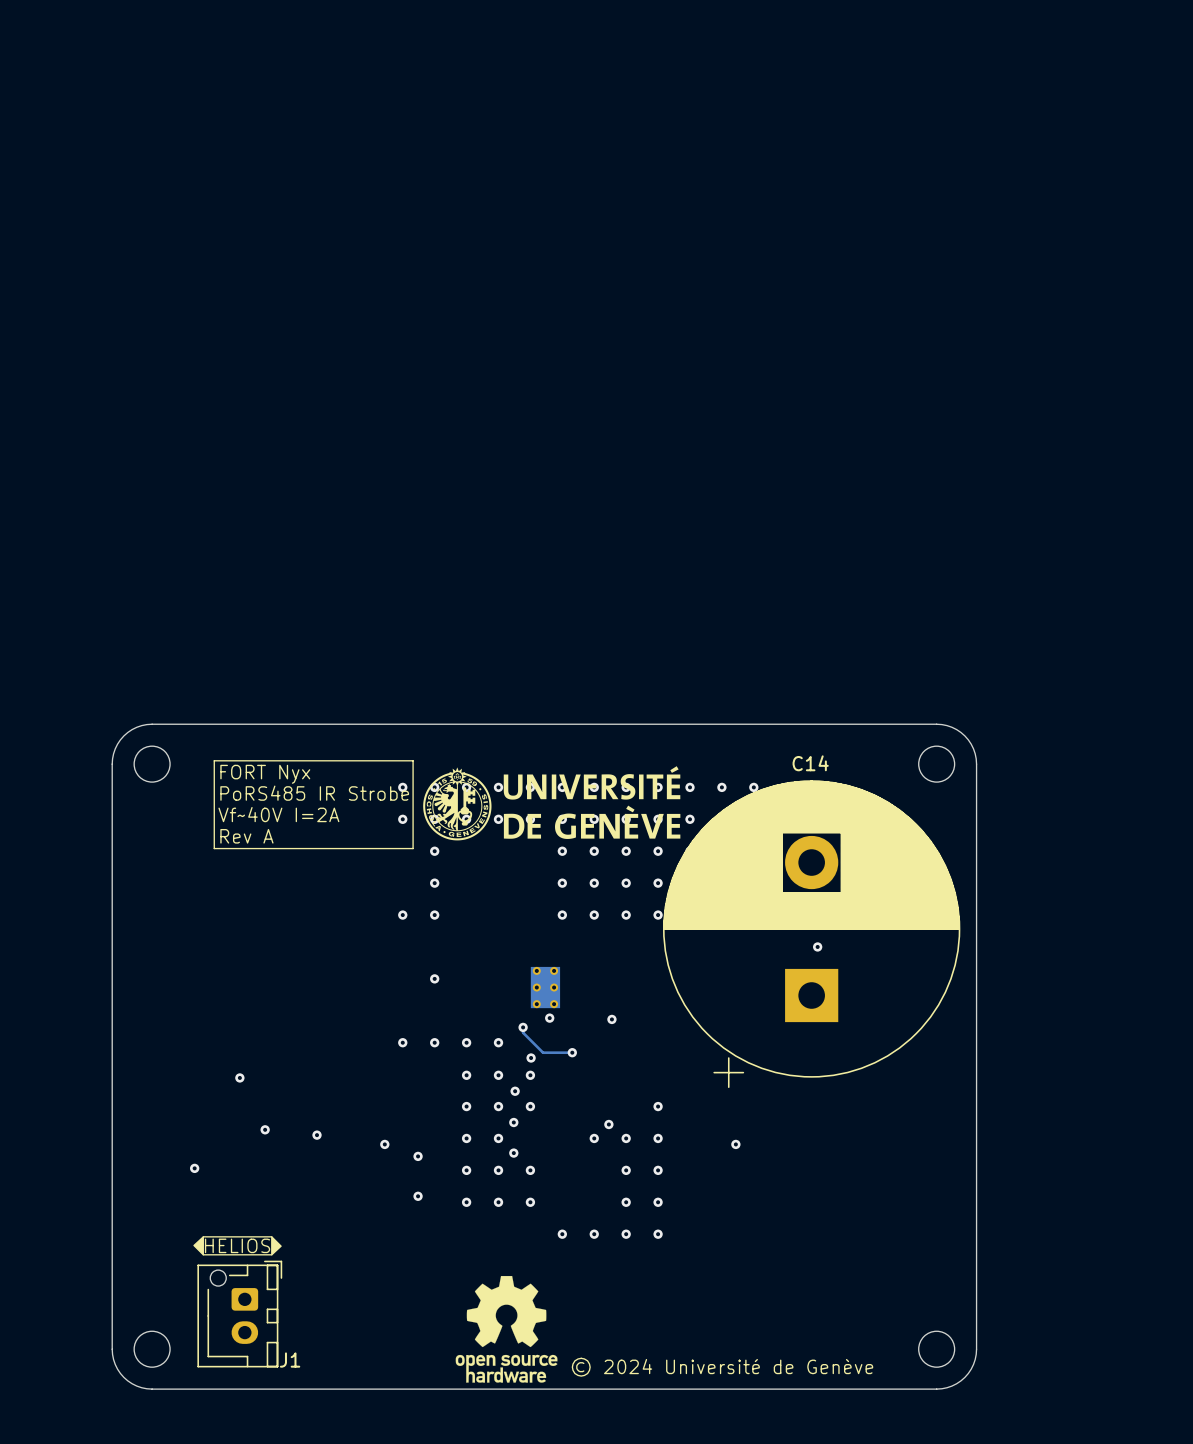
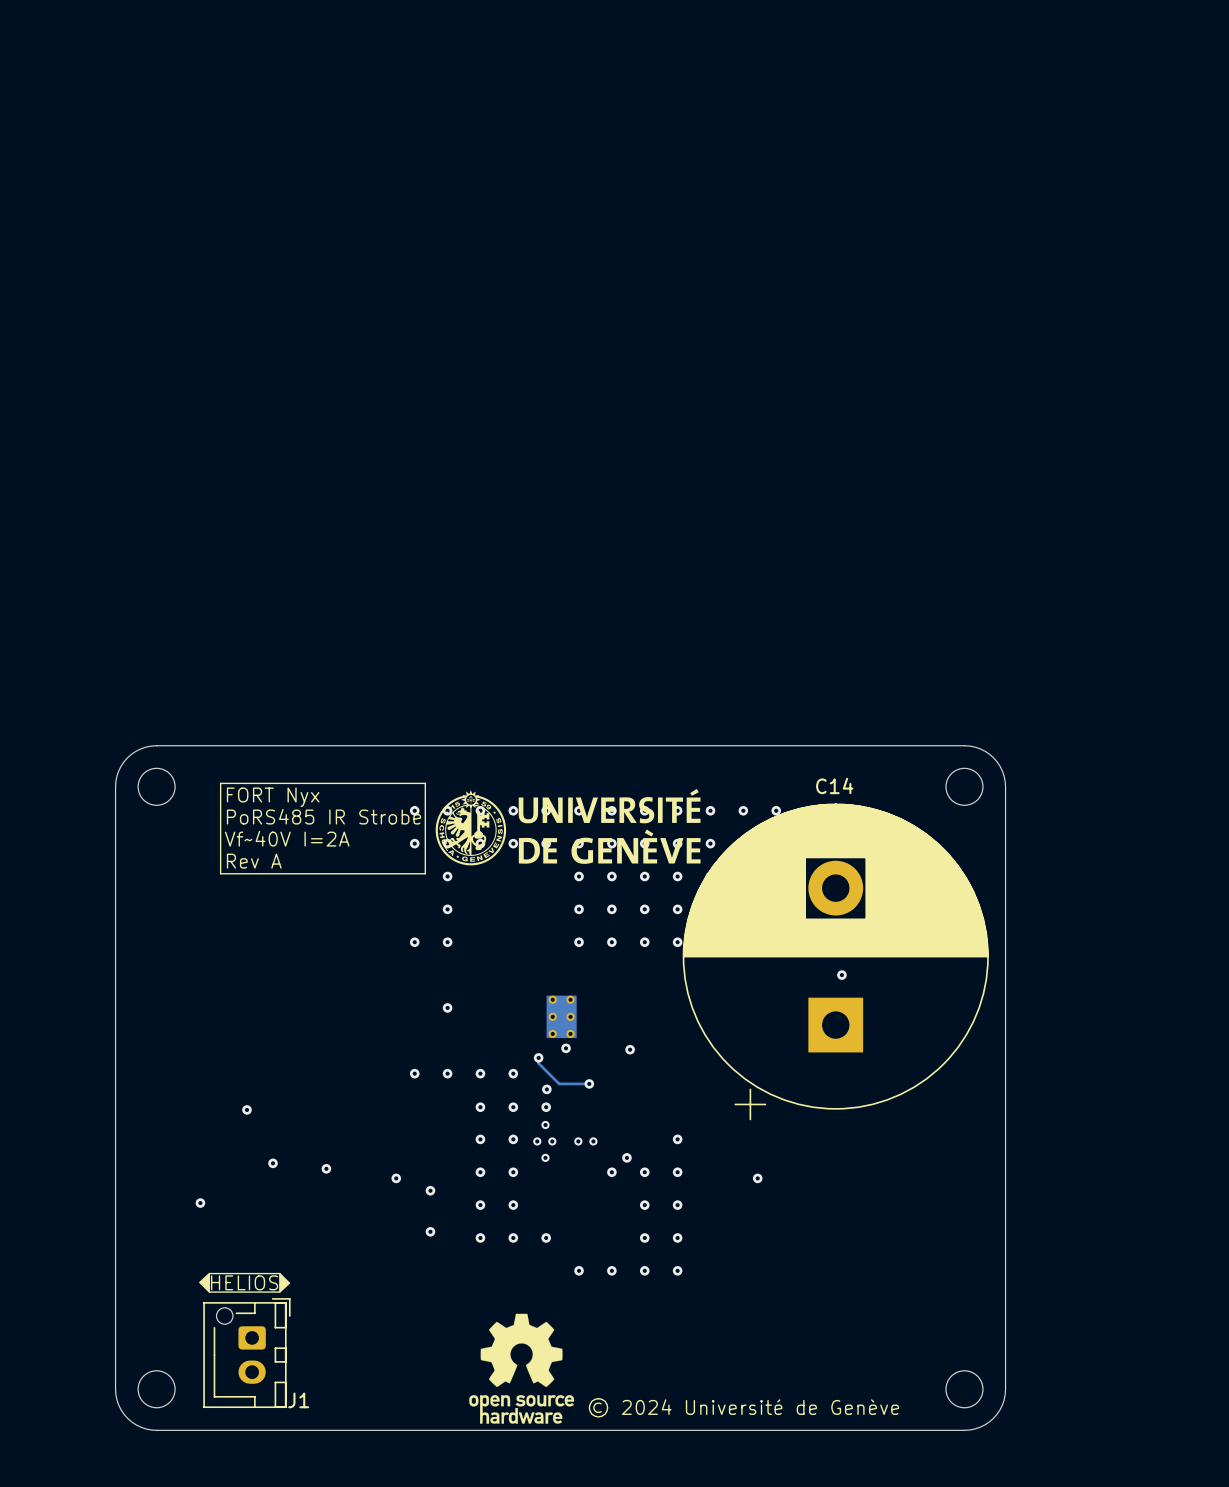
via: (515, 1091) -> none
via: none -> (545, 1125)
via: (530, 1106) -> none
via: none -> (537, 1141)
via: none -> (552, 1141)
via: none -> (578, 1141)
via: none -> (593, 1141)
via: (513, 1122) -> none
via: none -> (545, 1157)
via: (513, 1153) -> none
via: (530, 1170) -> none

